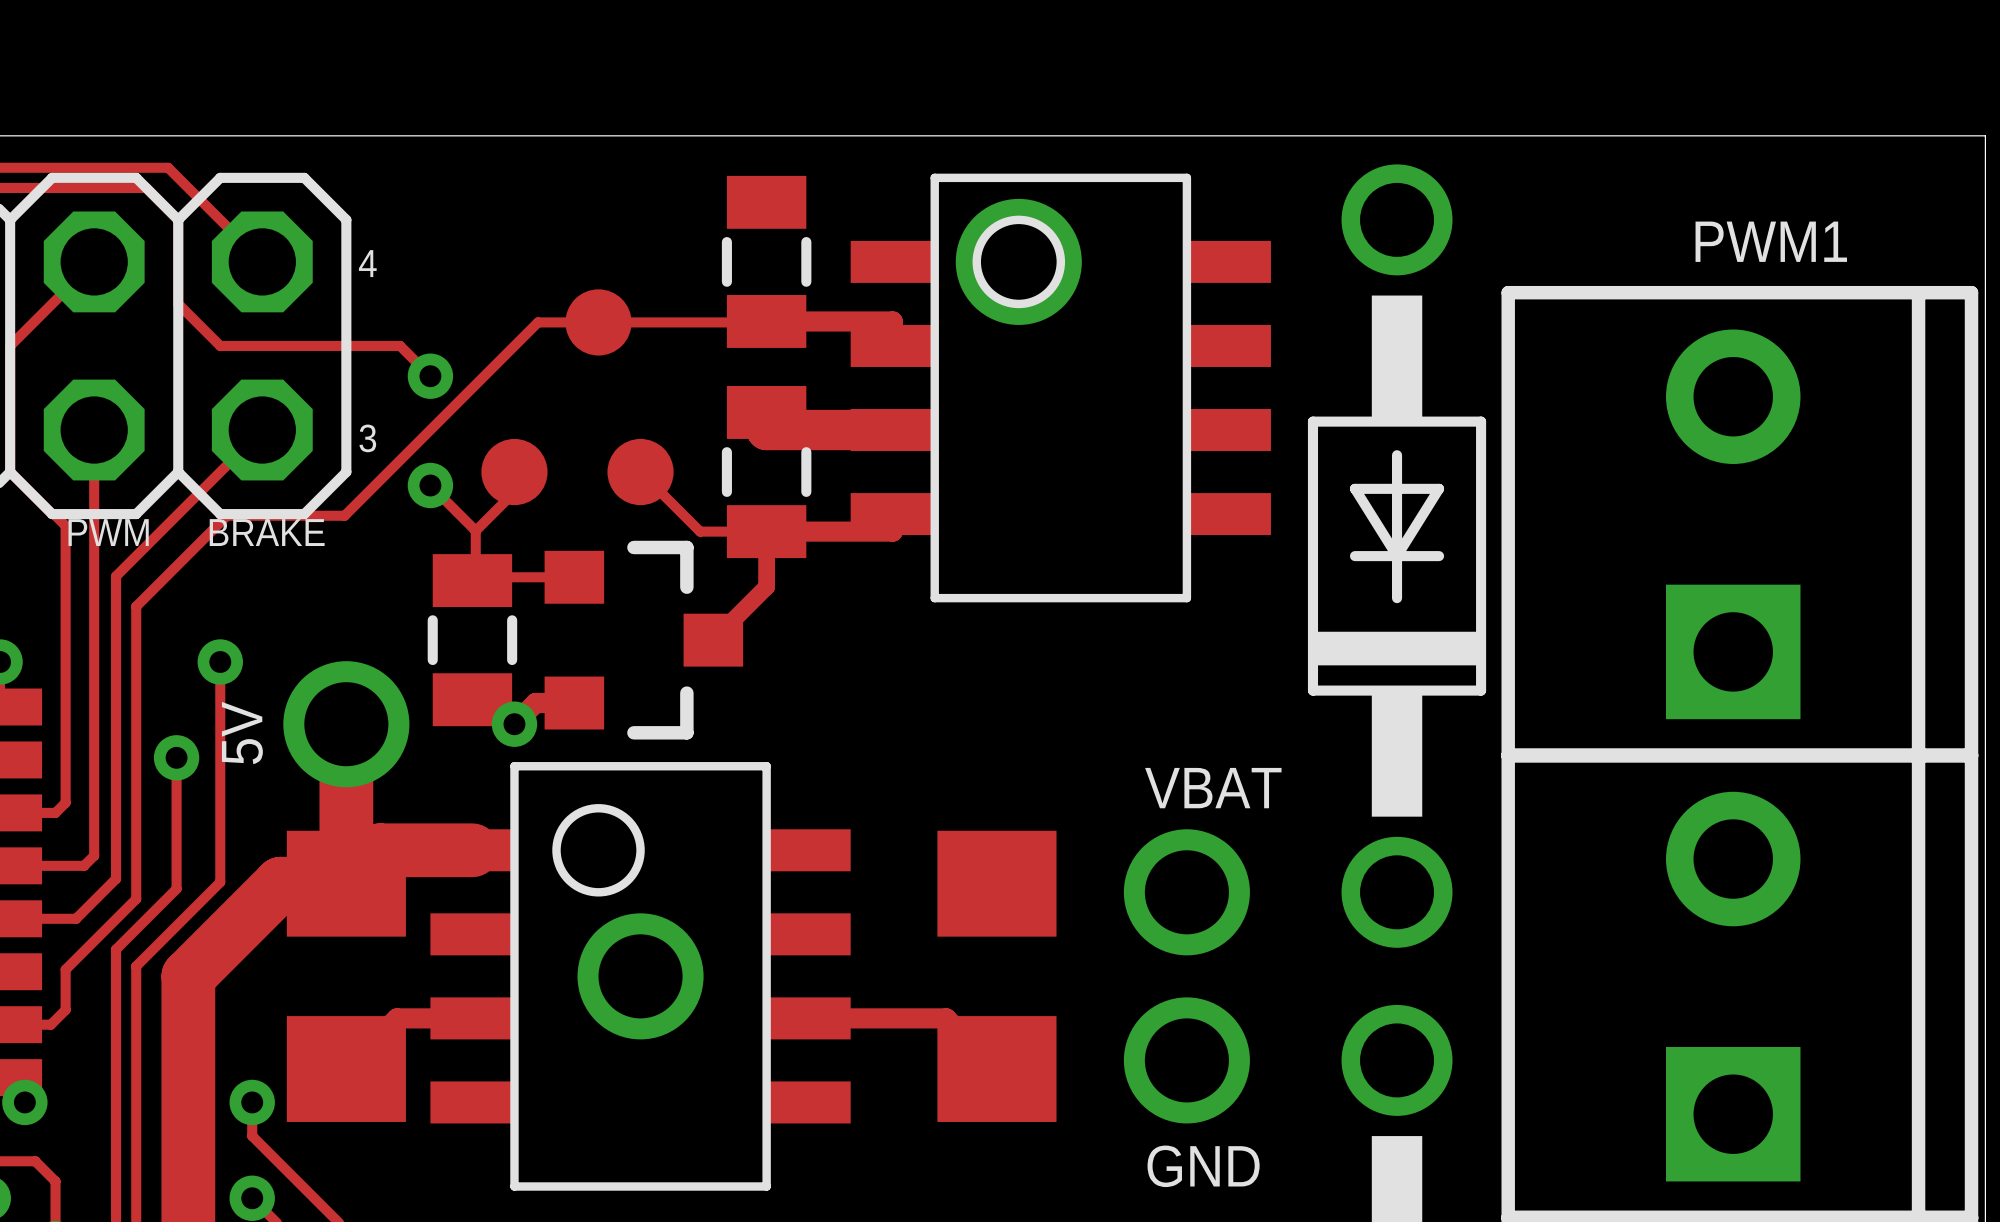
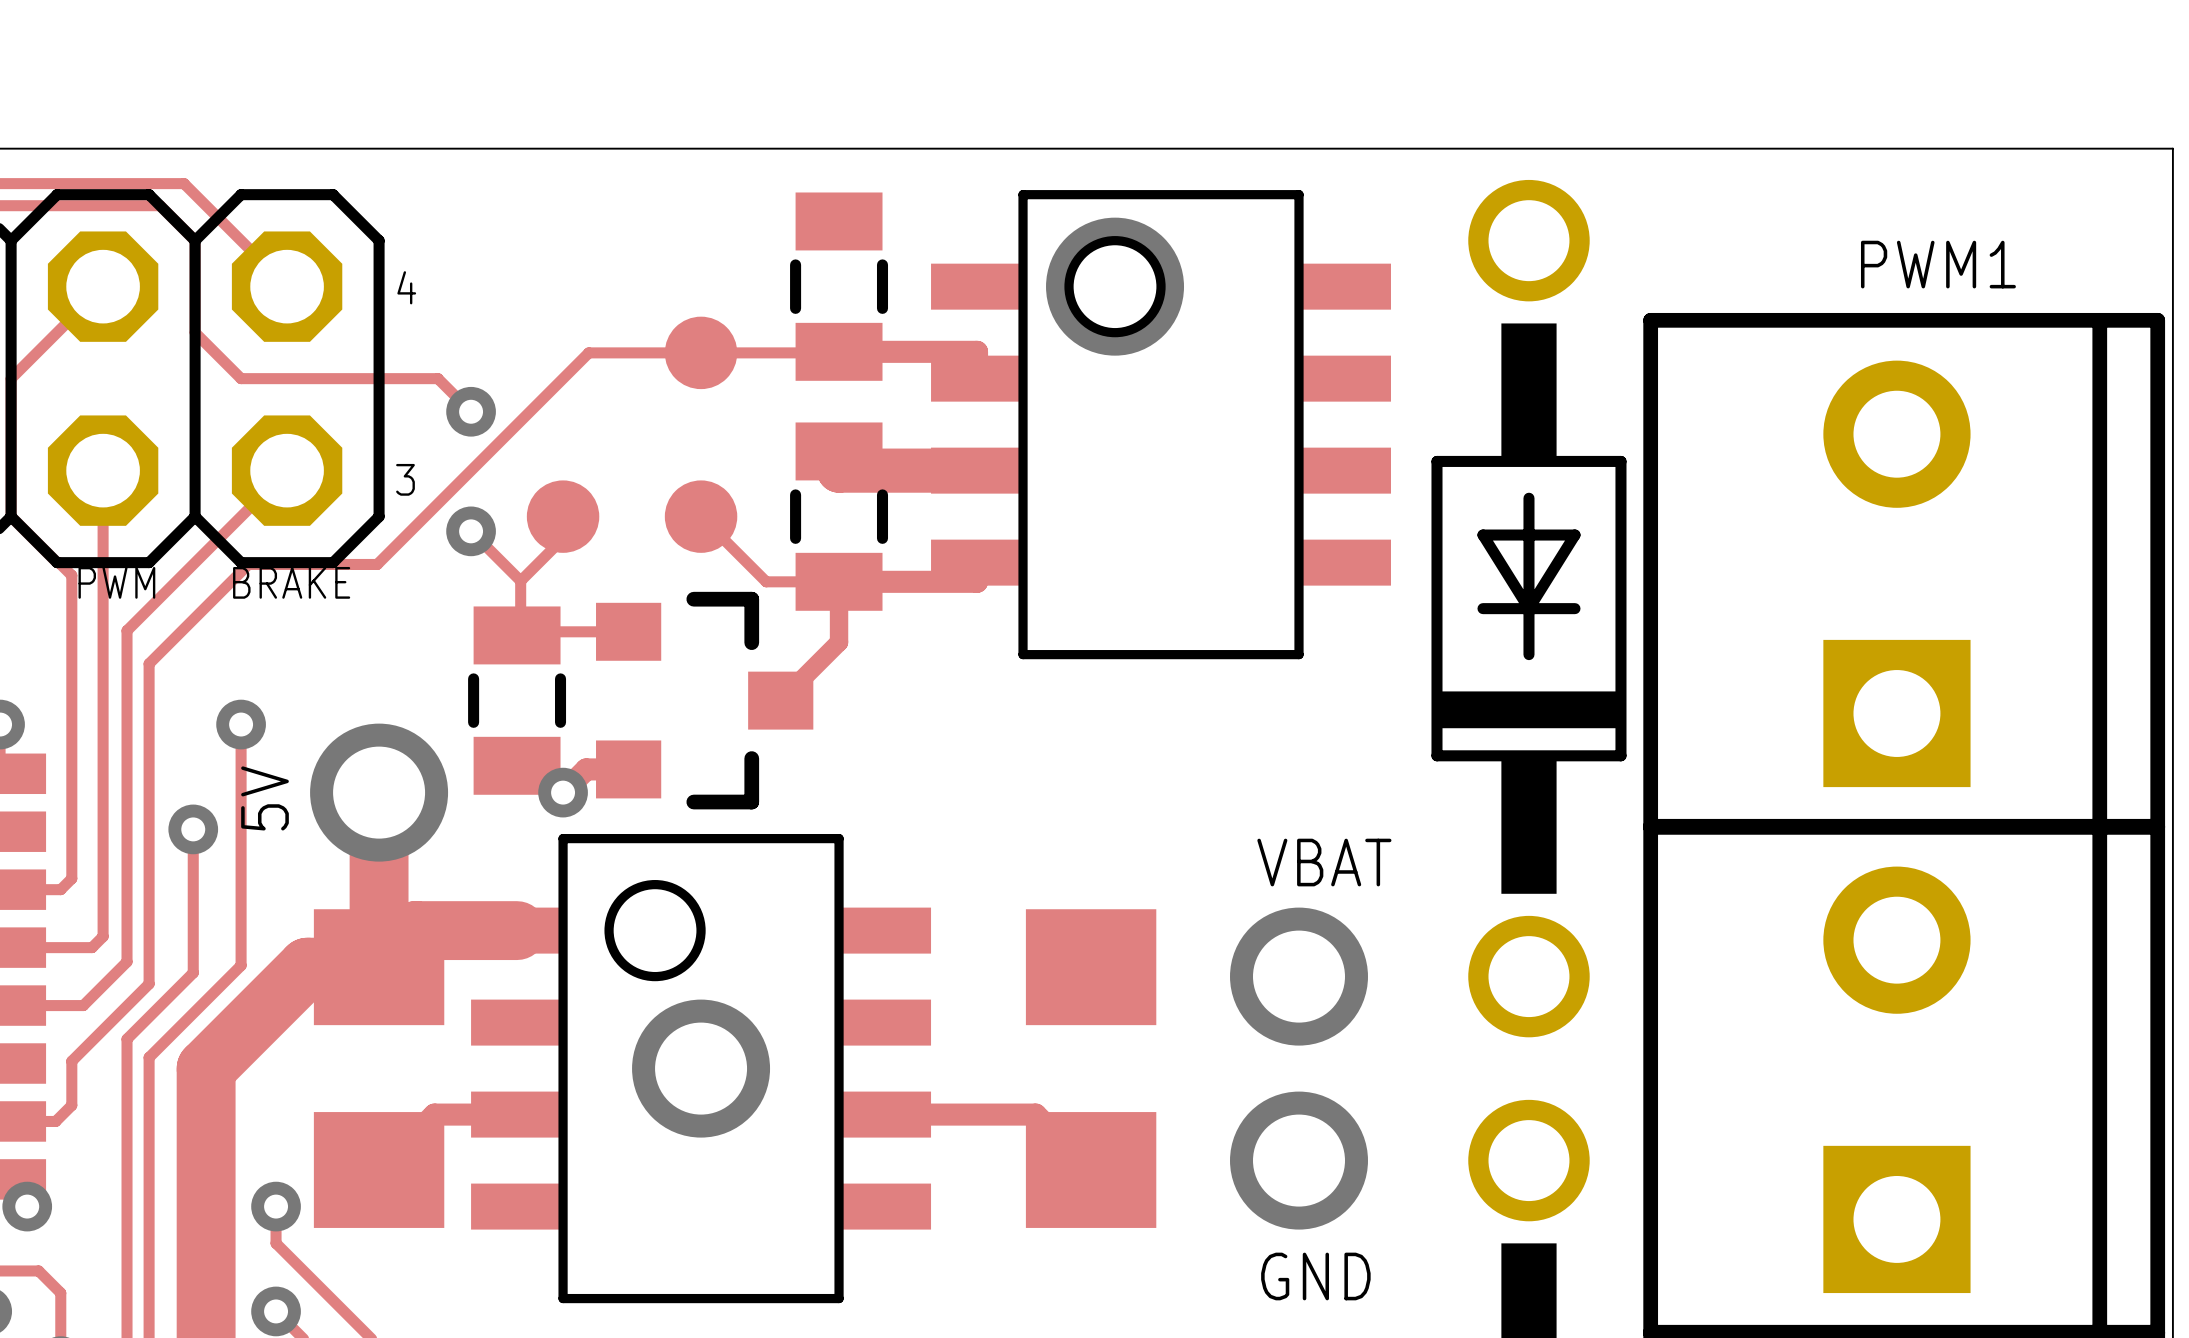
part position: (598, 322) -> (701, 352)

